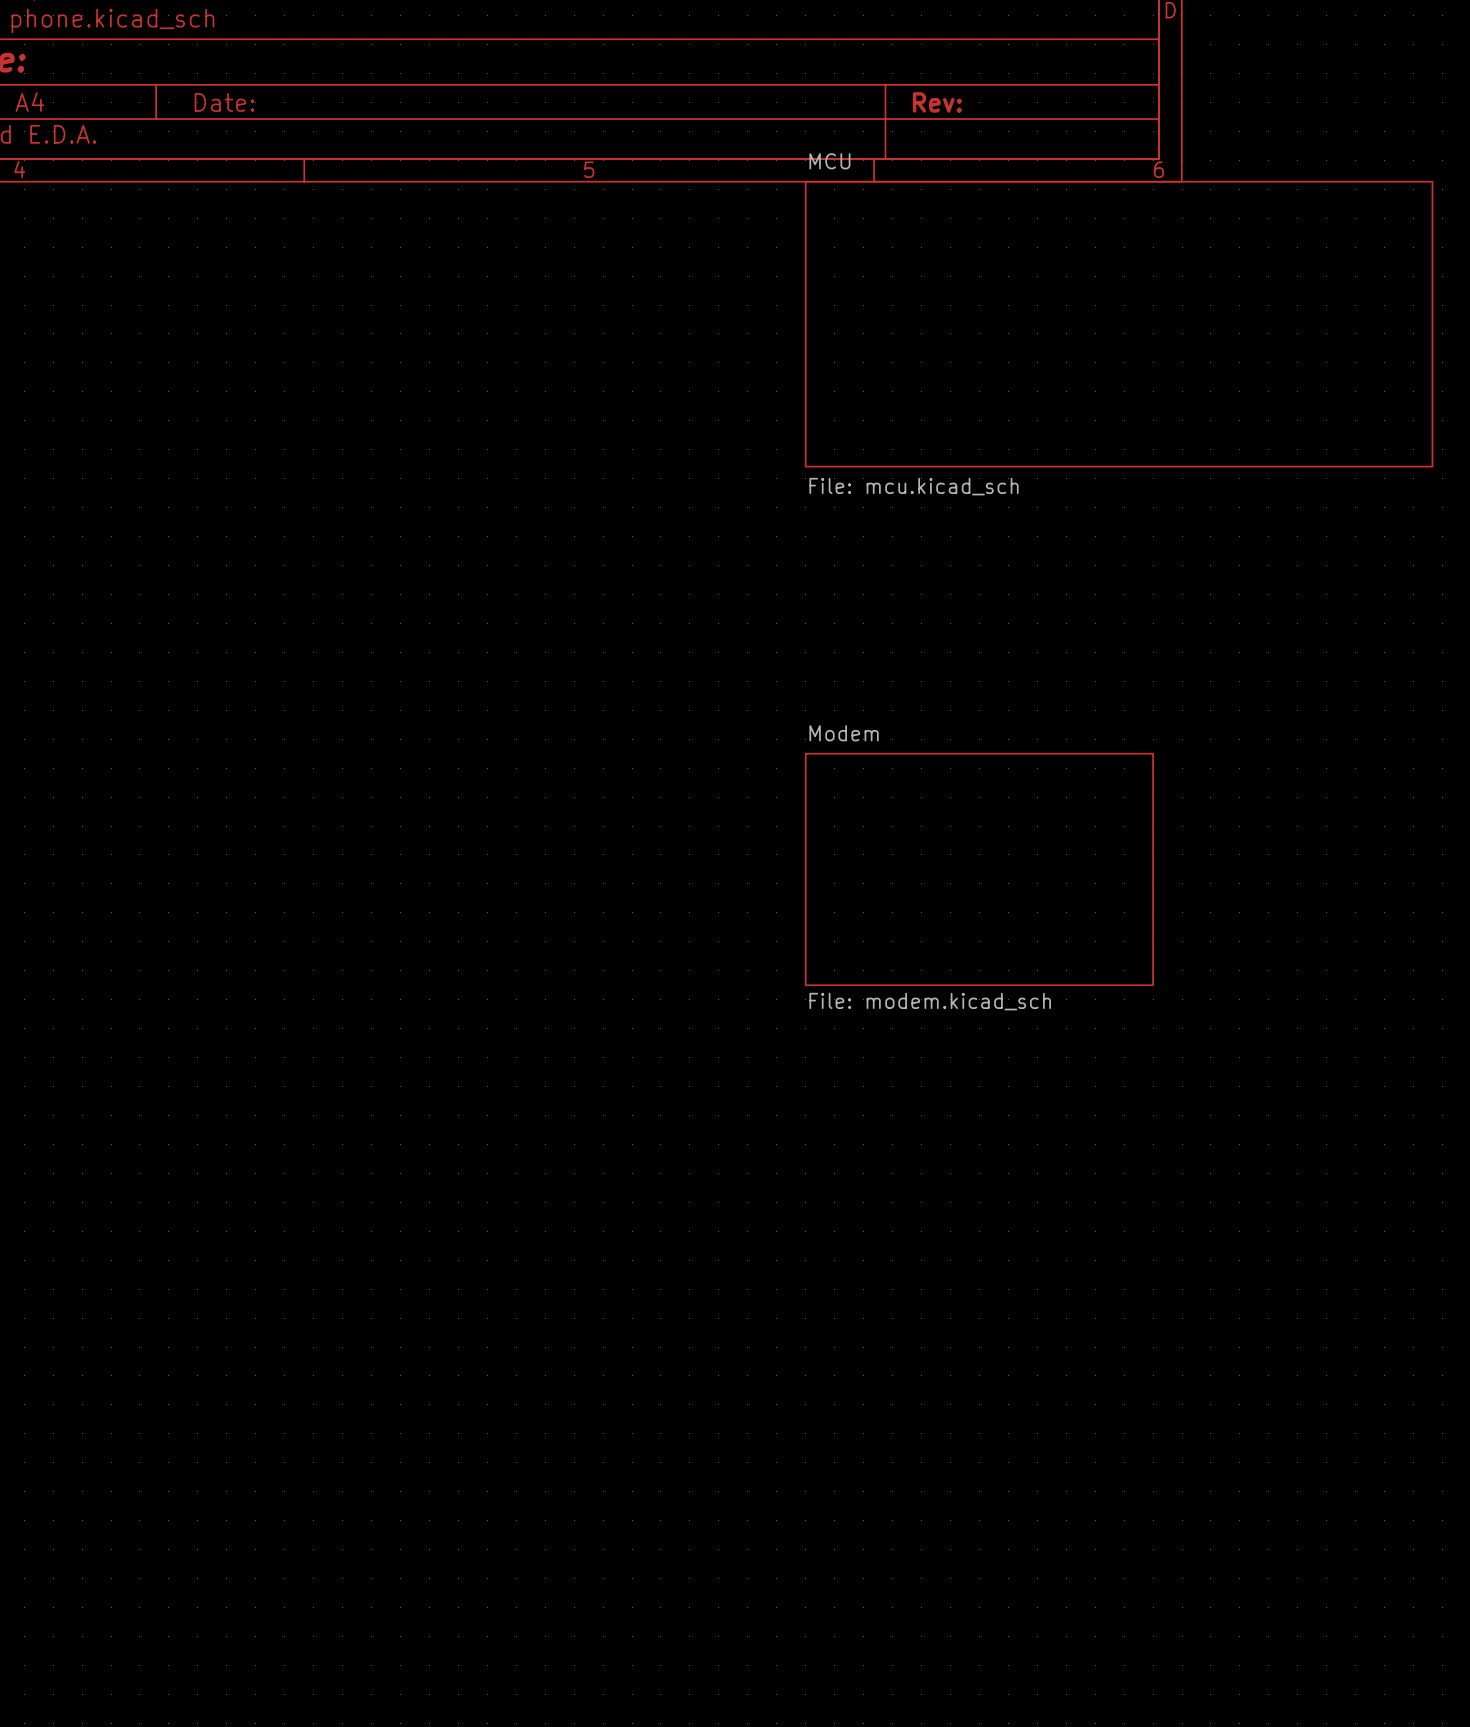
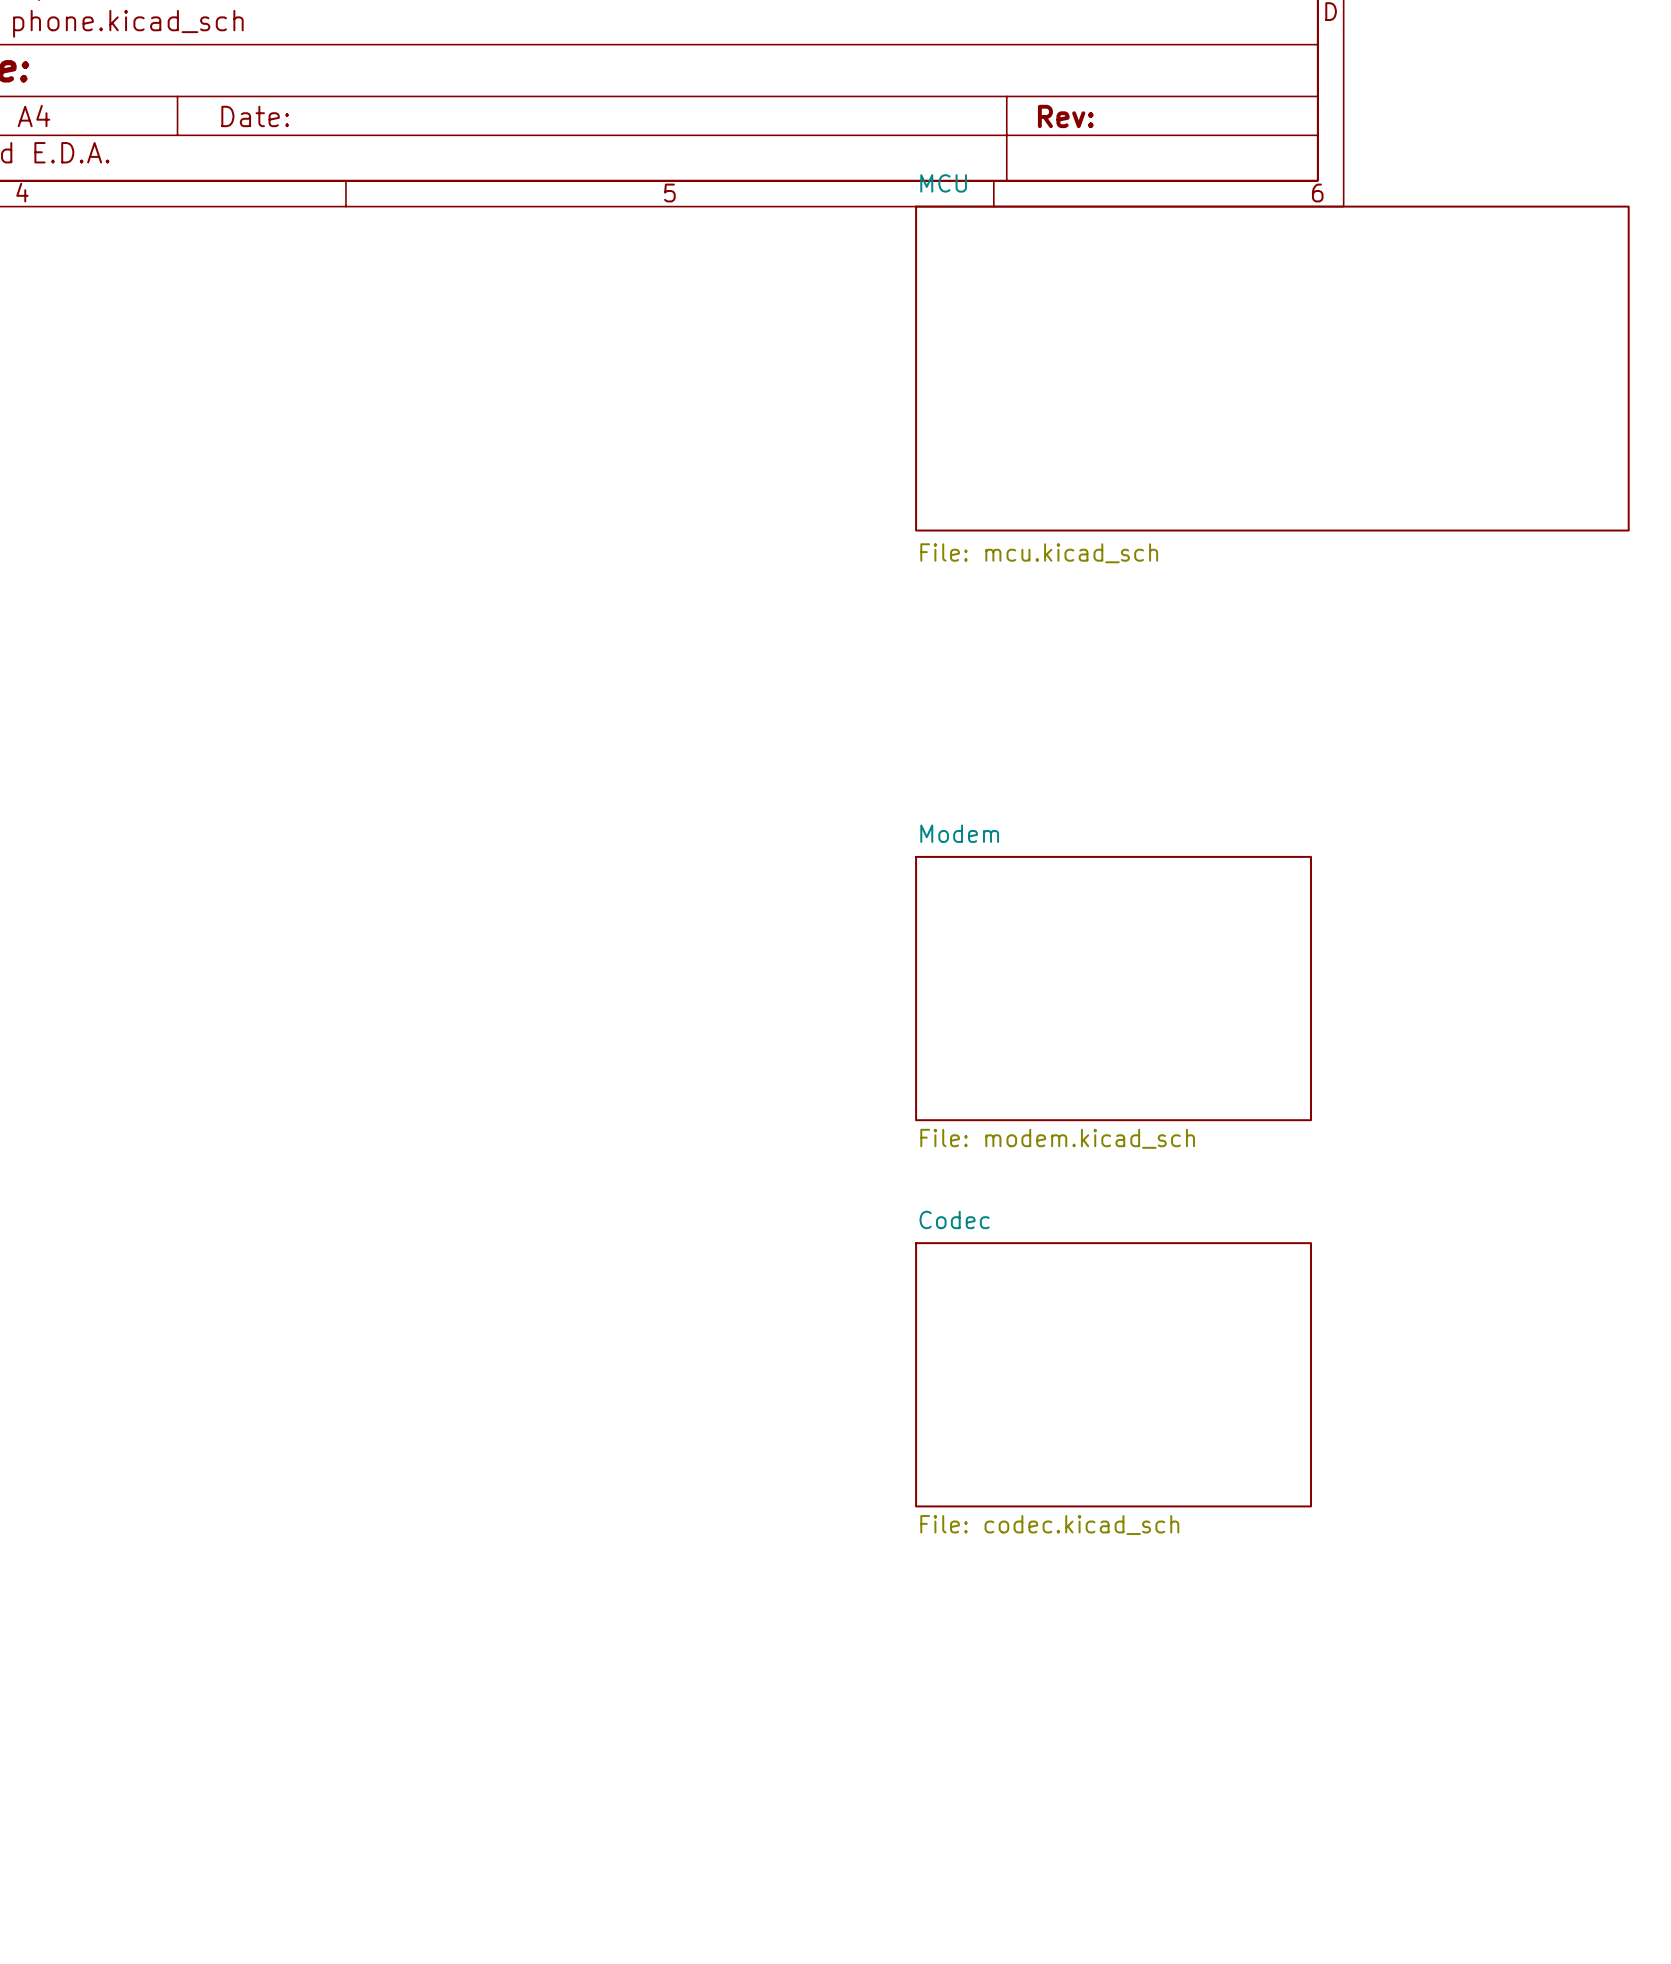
sheet Codec: none -> File: codec.kicad_sch (1113, 1374)

